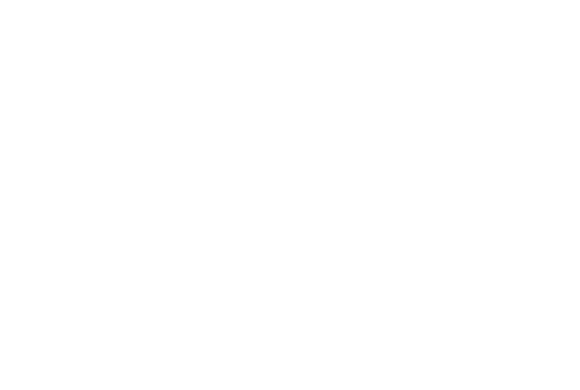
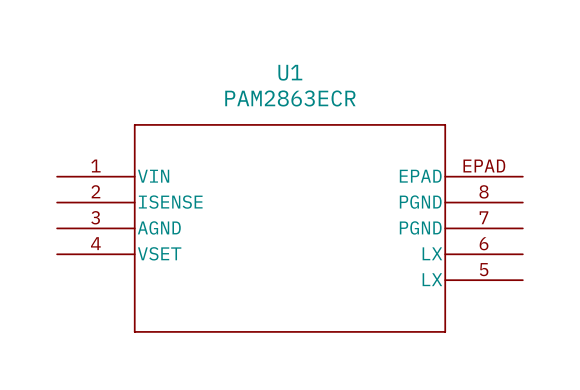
U1: none -> PAM2863ECR (289, 228)

